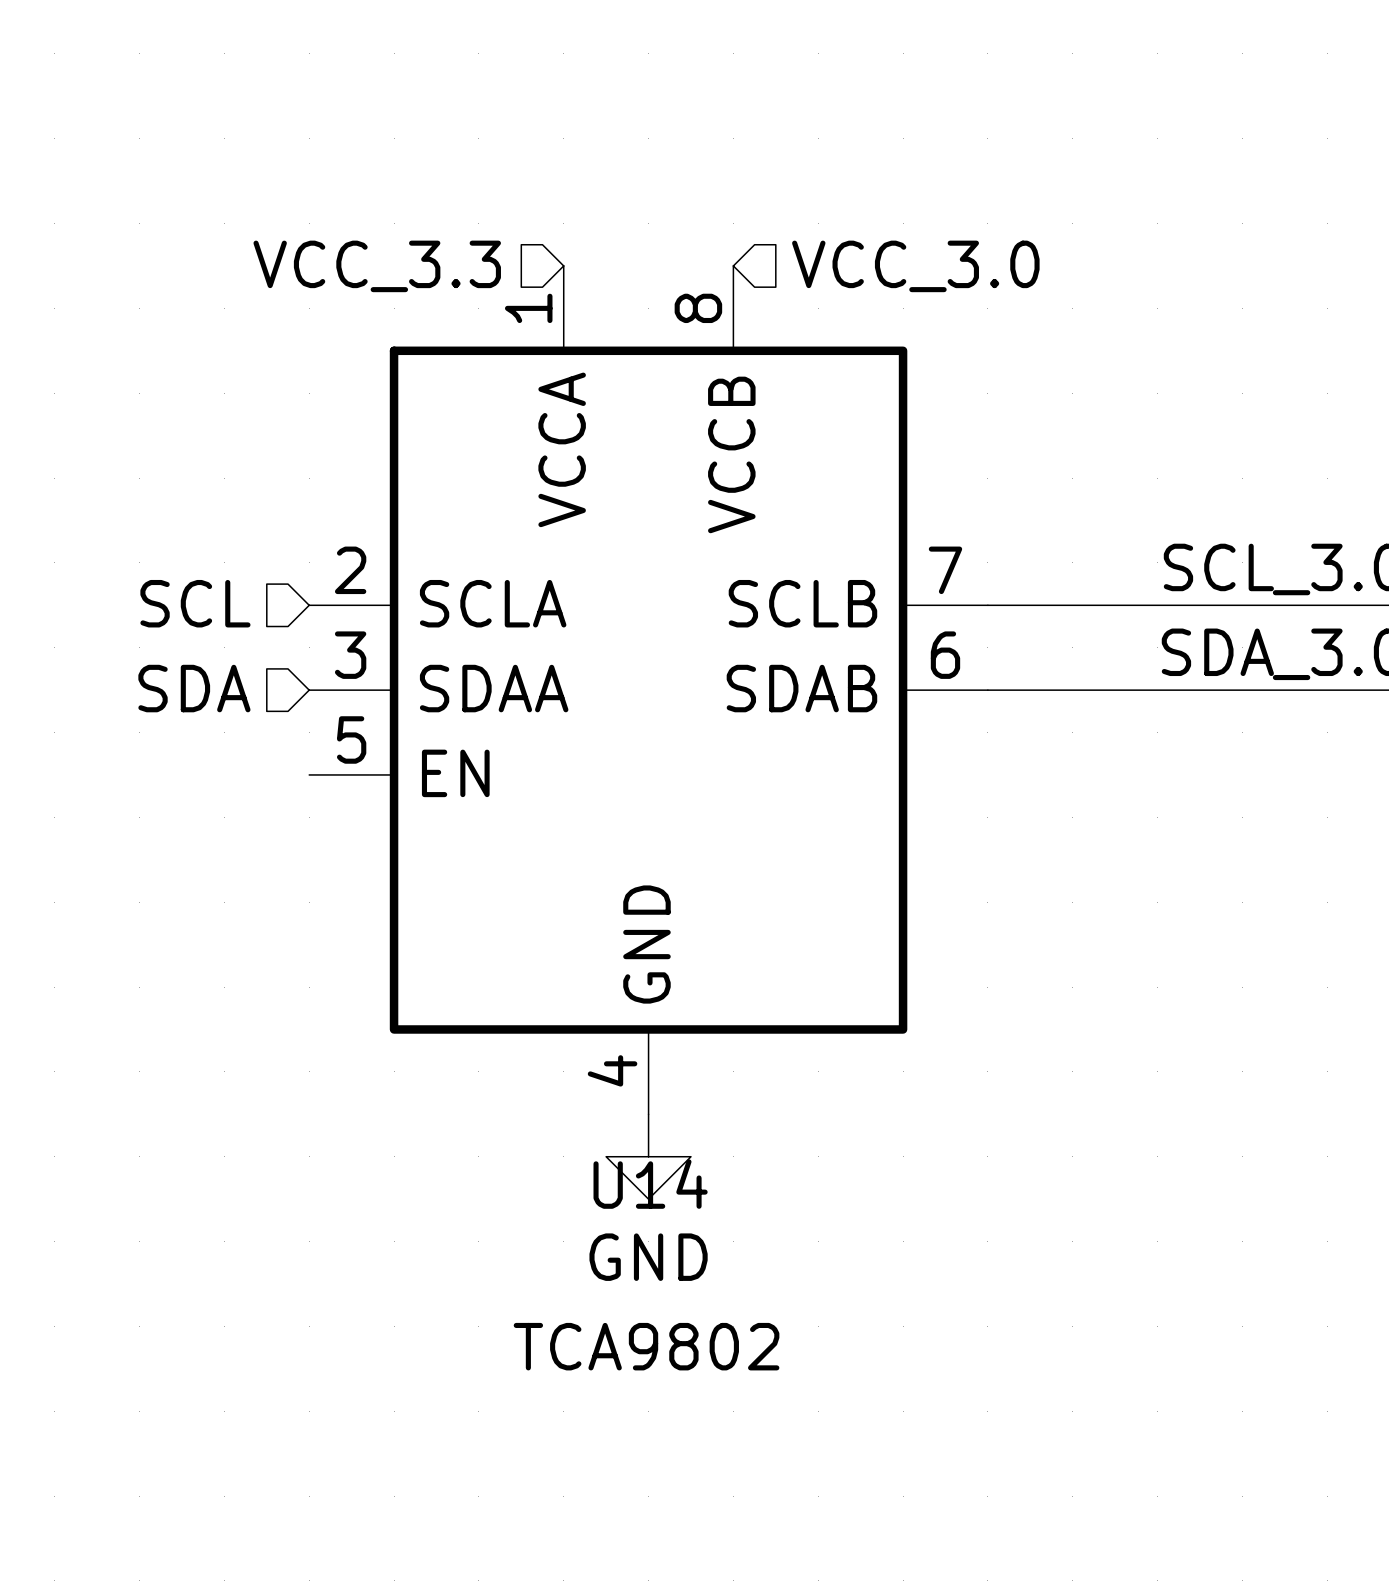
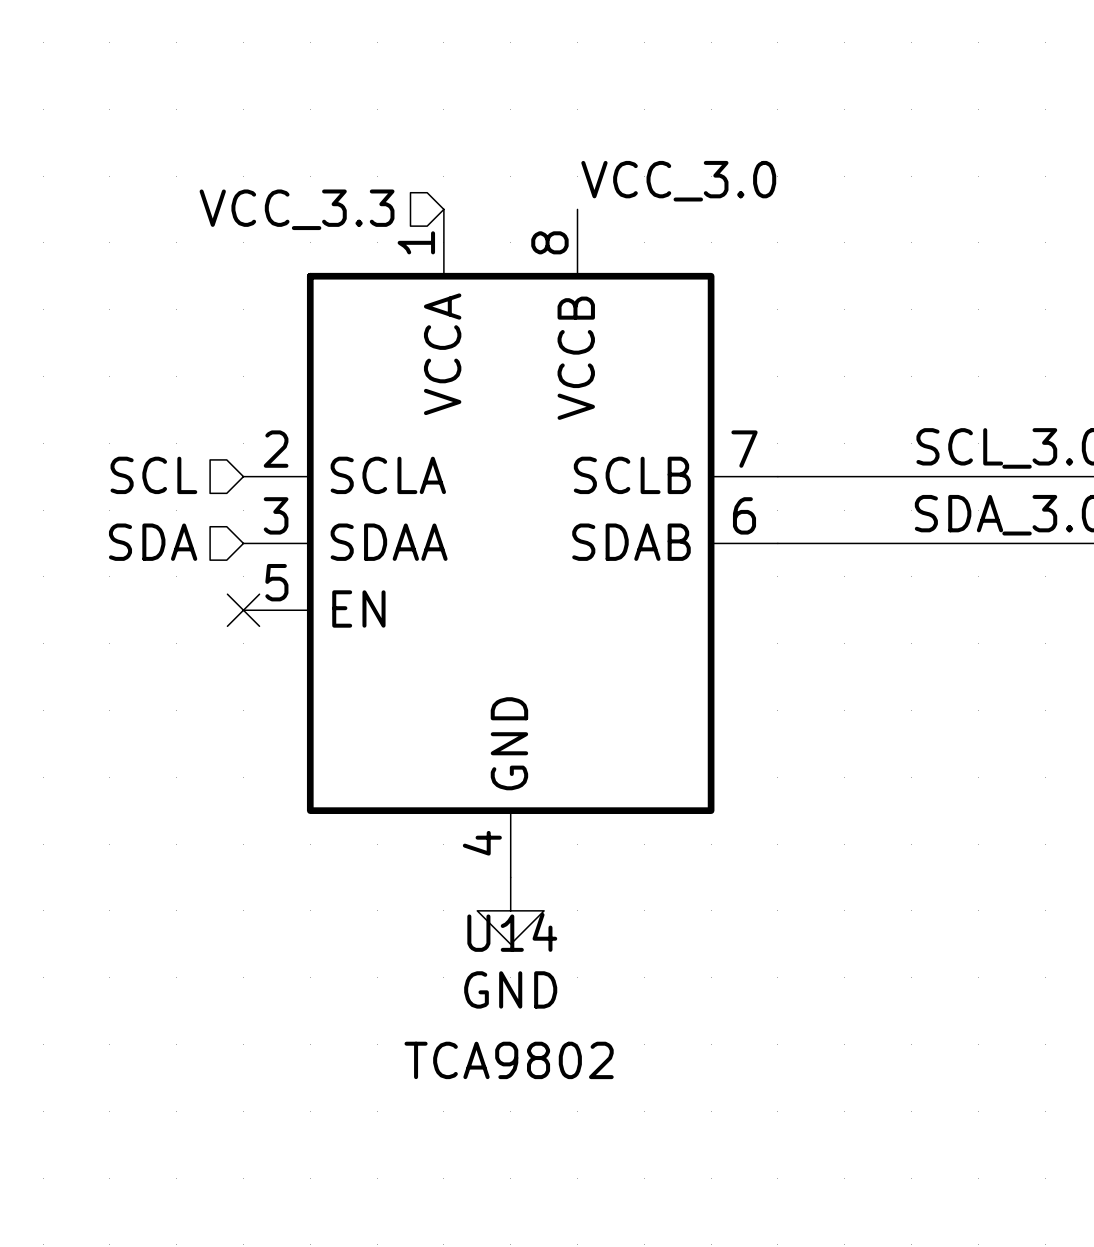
label: none -> VCC_3.0 (678, 181)
hierarchical label: VCC_3.0 (915, 266) -> none
no-connect mark: none -> (243, 610)

